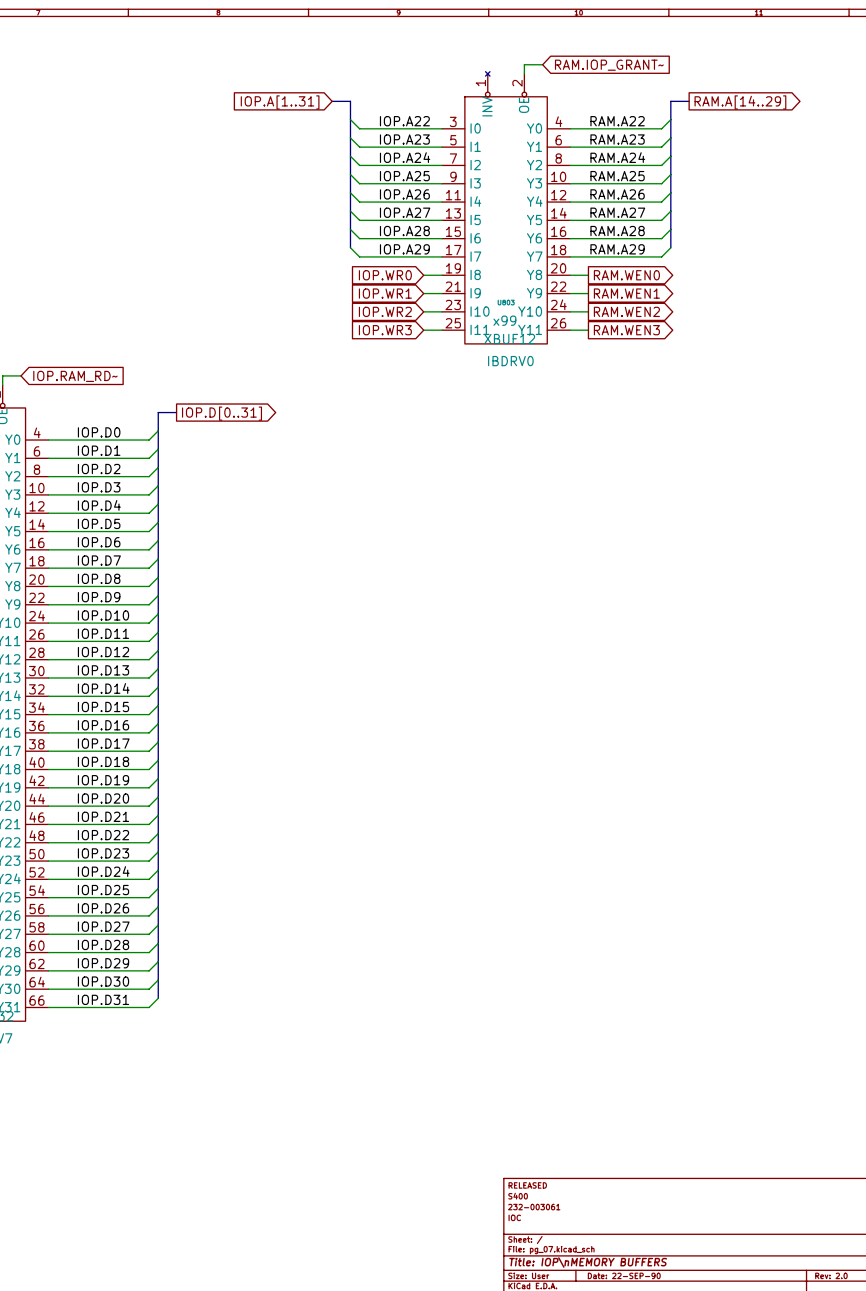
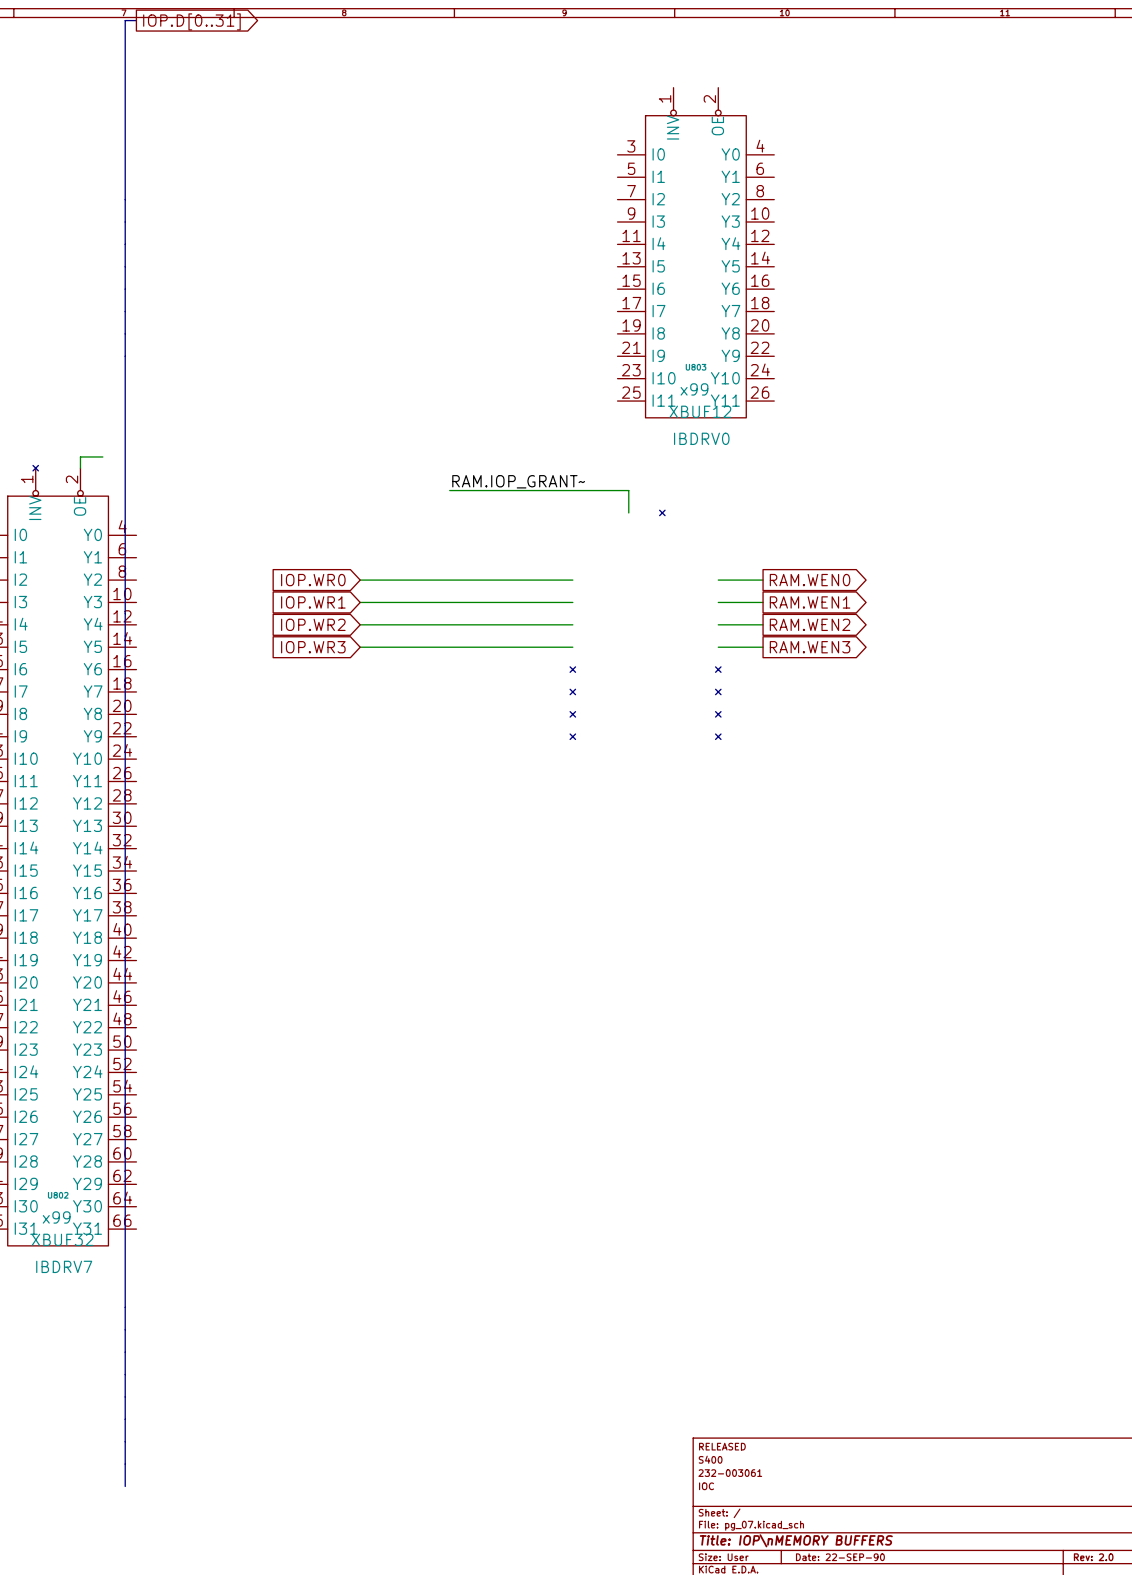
bus: none -> (136, 20) (125, 20) (125, 1486)
global label: none -> IOP.D[0..31] (191, 21)
wire: (542, 64) (524, 64) (524, 73) -> none
global label: RAM.IOP_GRANT~ (609, 65) -> none
no-connect mark: (487, 73) -> none
bus: (332, 101) (350, 101) (350, 247) -> none
bus: (689, 101) (670, 101) (670, 247) -> none
global label: IOP.A[1..31] (280, 102) -> none
global label: RAM.A[14..29] (740, 102) -> none
wire: (350, 119) (359, 128) (442, 128) -> none
wire: (670, 119) (661, 128) (570, 128) -> none
label: IOP.A22 (404, 121) -> none
label: RAM.A22 (617, 121) -> none
wire: (350, 137) (359, 147) (442, 147) -> none
wire: (670, 137) (661, 147) (570, 147) -> none
label: IOP.A23 (404, 139) -> none
label: RAM.A23 (617, 139) -> none
wire: (350, 156) (359, 165) (442, 165) -> none
wire: (670, 156) (661, 165) (570, 165) -> none
label: IOP.A24 (405, 157) -> none
label: RAM.A24 (617, 157) -> none
wire: (350, 174) (359, 183) (442, 183) -> none
wire: (670, 174) (661, 183) (570, 183) -> none
label: IOP.A25 (404, 176) -> none
label: RAM.A25 (617, 176) -> none
wire: (350, 192) (359, 202) (442, 202) -> none
wire: (670, 192) (661, 202) (570, 202) -> none
label: IOP.A26 (404, 194) -> none
label: RAM.A26 (617, 194) -> none
wire: (350, 211) (359, 220) (442, 220) -> none
wire: (670, 211) (661, 220) (570, 220) -> none
label: IOP.A27 (405, 212) -> none
label: RAM.A27 (617, 212) -> none
wire: (350, 229) (359, 238) (442, 238) -> none
wire: (670, 229) (661, 238) (570, 238) -> none
label: IOP.A28 (404, 231) -> none
label: RAM.A28 (617, 231) -> none
wire: (350, 247) (359, 256) (442, 256) -> none
wire: (670, 247) (661, 256) (570, 256) -> none
label: IOP.A29 (404, 249) -> none
label: RAM.A29 (617, 249) -> none
global label: IOP.WR0 (385, 275) -> none
wire: (423, 275) (442, 275) -> none
wire: (570, 275) (588, 275) -> none
global label: RAM.WEN0 (626, 275) -> none
global label: IOP.WR1 (385, 293) -> none
wire: (423, 293) (442, 293) -> none
wire: (570, 293) (588, 293) -> none
global label: RAM.WEN1 (626, 293) -> none
global label: IOP.WR2 (385, 311) -> none
wire: (423, 311) (442, 311) -> none
wire: (570, 311) (588, 311) -> none
global label: RAM.WEN2 (626, 311) -> none
global label: IOP.WR3 (385, 330) -> none
wire: (423, 330) (442, 330) -> none
wire: (570, 330) (588, 330) -> none
global label: RAM.WEN3 (626, 330) -> none
global label: IOP.RAM_RD~ (75, 376) -> none
label: none -> RAM.IOP_GRANT~ (518, 481)
wire: none -> (449, 490) (628, 490) (628, 512)
bus: (176, 412) (158, 412) (158, 998) -> none
global label: IOP.D[0..31] (221, 413) -> none
no-connect mark: none -> (662, 512)
wire: (158, 430) (149, 440) (48, 440) -> none
label: IOP.D0 (99, 432) -> none
wire: (158, 449) (149, 458) (48, 458) -> none
label: IOP.D1 (99, 450) -> none
wire: (158, 467) (149, 476) (48, 476) -> none
label: IOP.D2 (99, 469) -> none
global label: none -> IOP.WR0 (313, 580)
wire: none -> (360, 580) (572, 580)
wire: none -> (718, 580) (763, 580)
global label: none -> RAM.WEN0 (810, 580)
wire: (158, 485) (149, 494) (48, 494) -> none
label: IOP.D3 (99, 487) -> none
global label: none -> IOP.WR1 (313, 602)
wire: none -> (360, 602) (572, 602)
wire: none -> (718, 602) (763, 602)
global label: none -> RAM.WEN1 (810, 602)
wire: (158, 504) (149, 513) (48, 513) -> none
label: IOP.D4 (99, 505) -> none
global label: none -> IOP.WR2 (313, 624)
wire: none -> (360, 624) (572, 624)
wire: none -> (718, 624) (763, 624)
global label: none -> RAM.WEN2 (810, 624)
wire: (158, 522) (149, 531) (48, 531) -> none
label: IOP.D5 (99, 523) -> none
global label: none -> IOP.WR3 (313, 647)
wire: none -> (360, 647) (572, 647)
wire: none -> (718, 647) (763, 647)
global label: none -> RAM.WEN3 (810, 647)
wire: (158, 540) (149, 549) (48, 549) -> none
label: IOP.D6 (99, 542) -> none
no-connect mark: none -> (572, 669)
no-connect mark: none -> (718, 669)
wire: (158, 559) (149, 568) (48, 568) -> none
label: IOP.D7 (99, 560) -> none
no-connect mark: none -> (572, 691)
no-connect mark: none -> (718, 691)
wire: (158, 577) (149, 586) (48, 586) -> none
label: IOP.D8 (99, 578) -> none
no-connect mark: none -> (572, 714)
no-connect mark: none -> (718, 714)
wire: (158, 595) (149, 604) (48, 604) -> none
label: IOP.D9 (99, 597) -> none
no-connect mark: none -> (572, 736)
no-connect mark: none -> (718, 736)
wire: (158, 613) (149, 623) (48, 623) -> none
label: IOP.D10 (103, 615) -> none
wire: (158, 632) (149, 641) (48, 641) -> none
label: IOP.D11 (103, 633) -> none
wire: (158, 650) (149, 659) (48, 659) -> none
label: IOP.D12 (103, 652) -> none
wire: (158, 668) (149, 677) (48, 677) -> none
label: IOP.D13 (103, 670) -> none
wire: (158, 687) (149, 696) (48, 696) -> none
label: IOP.D14 (103, 688) -> none
wire: (158, 705) (149, 714) (48, 714) -> none
label: IOP.D15 (103, 706) -> none
wire: (158, 723) (149, 732) (48, 732) -> none
label: IOP.D16 (103, 725) -> none
wire: (158, 742) (149, 751) (48, 751) -> none
label: IOP.D17 (103, 743) -> none
wire: (158, 760) (149, 769) (48, 769) -> none
label: IOP.D18 (103, 761) -> none
wire: (158, 778) (149, 787) (48, 787) -> none
label: IOP.D19 (103, 780) -> none
wire: (158, 796) (149, 806) (48, 806) -> none
label: IOP.D20 (103, 798) -> none
wire: (158, 815) (149, 824) (48, 824) -> none
label: IOP.D21 (103, 816) -> none
wire: (158, 833) (149, 842) (48, 842) -> none
label: IOP.D22 (103, 835) -> none
wire: (158, 851) (149, 861) (48, 861) -> none
label: IOP.D23 (103, 853) -> none
wire: (158, 870) (149, 879) (48, 879) -> none
label: IOP.D24 (103, 871) -> none
wire: (158, 888) (149, 897) (48, 897) -> none
label: IOP.D25 (103, 890) -> none
wire: (158, 906) (149, 915) (48, 915) -> none
label: IOP.D26 (103, 908) -> none
wire: (158, 925) (149, 934) (48, 934) -> none
label: IOP.D27 (103, 926) -> none
wire: (158, 943) (149, 952) (48, 952) -> none
label: IOP.D28 (103, 944) -> none
wire: (158, 961) (149, 970) (48, 970) -> none
label: IOP.D29 (103, 963) -> none
wire: (158, 980) (149, 989) (48, 989) -> none
label: IOP.D30 (103, 981) -> none
wire: (158, 998) (149, 1007) (48, 1007) -> none
label: IOP.D31 (103, 999) -> none

